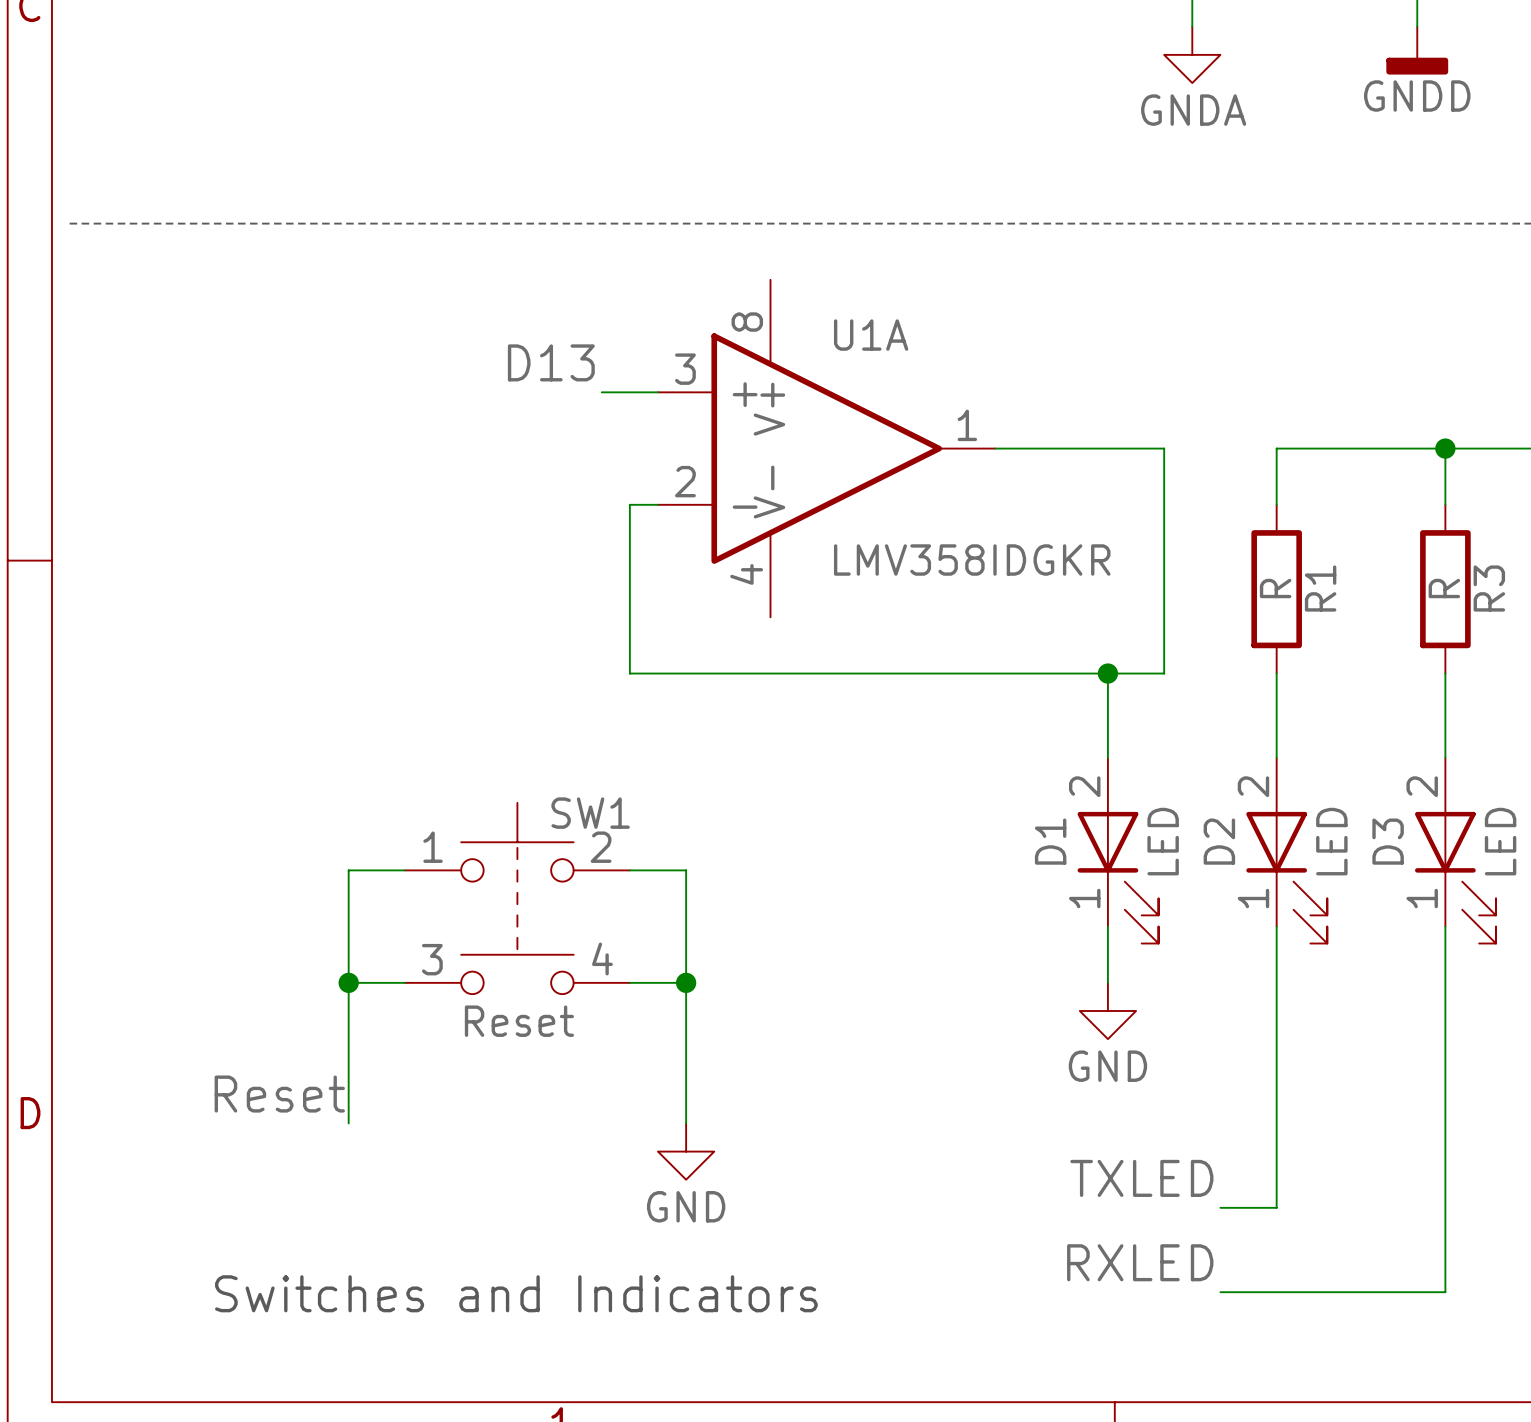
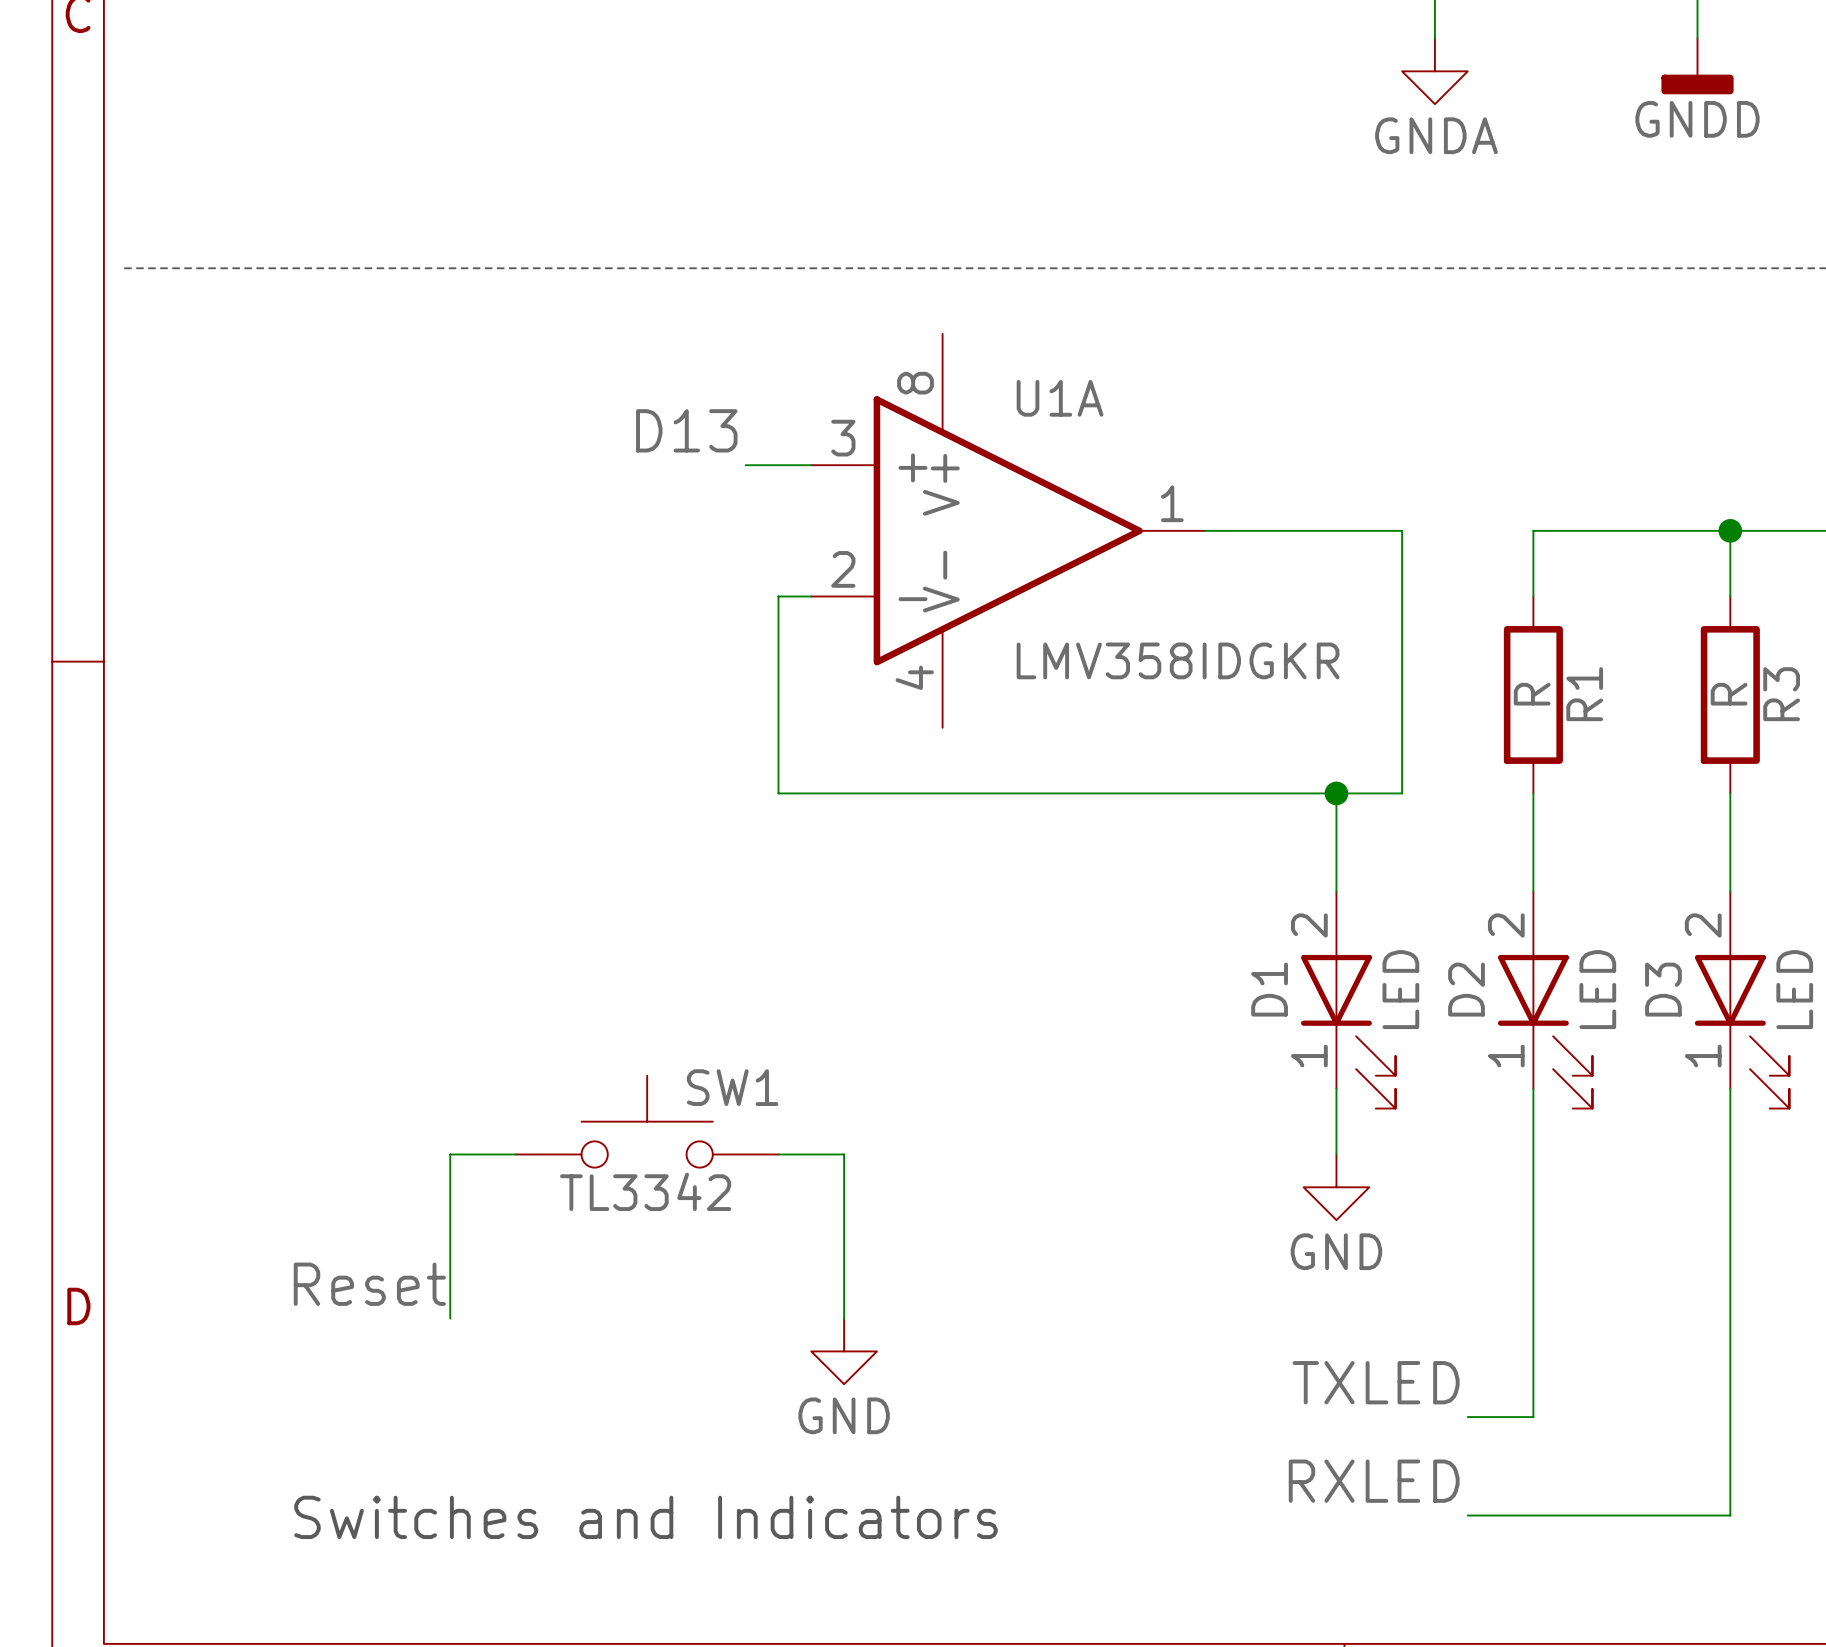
SW1 symbol: [404, 802, 630, 995] -> [515, 1075, 779, 1168]
SW1 name position: SW1 (590, 813) -> SW1 (732, 1087)
wire: (404, 870) (348, 870) (348, 982) -> none
wire: (629, 870) (686, 870) (686, 982) -> none
junction: (348, 982) -> none
junction: (686, 982) -> none
SW1 value: Reset (519, 1021) -> TL3342 (645, 1191)

